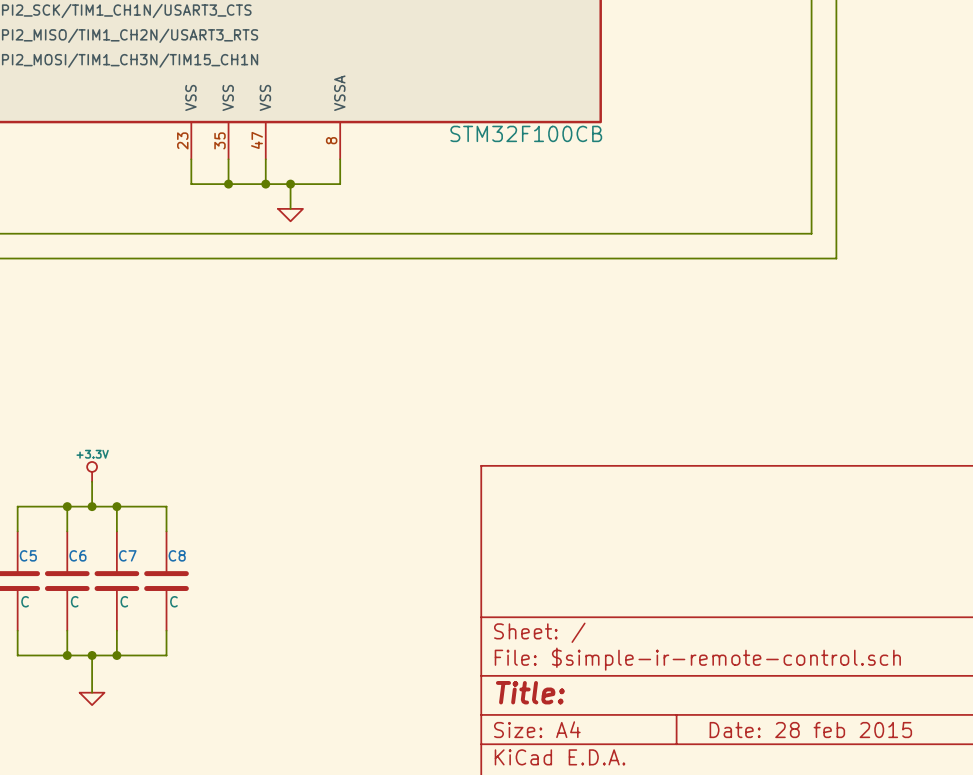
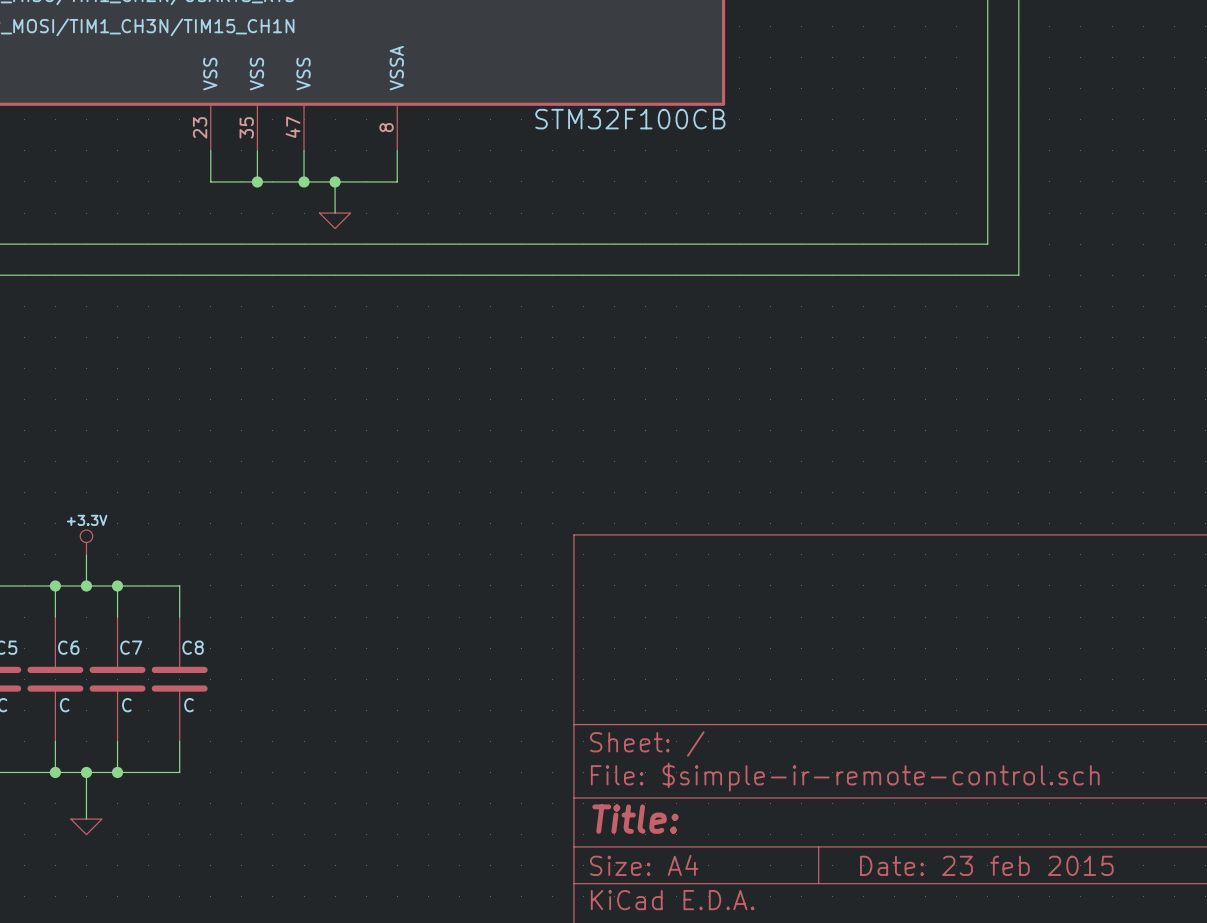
title block: Date: 28 feb 2015 (810, 730) -> Date: 23 feb 2015 (986, 865)

